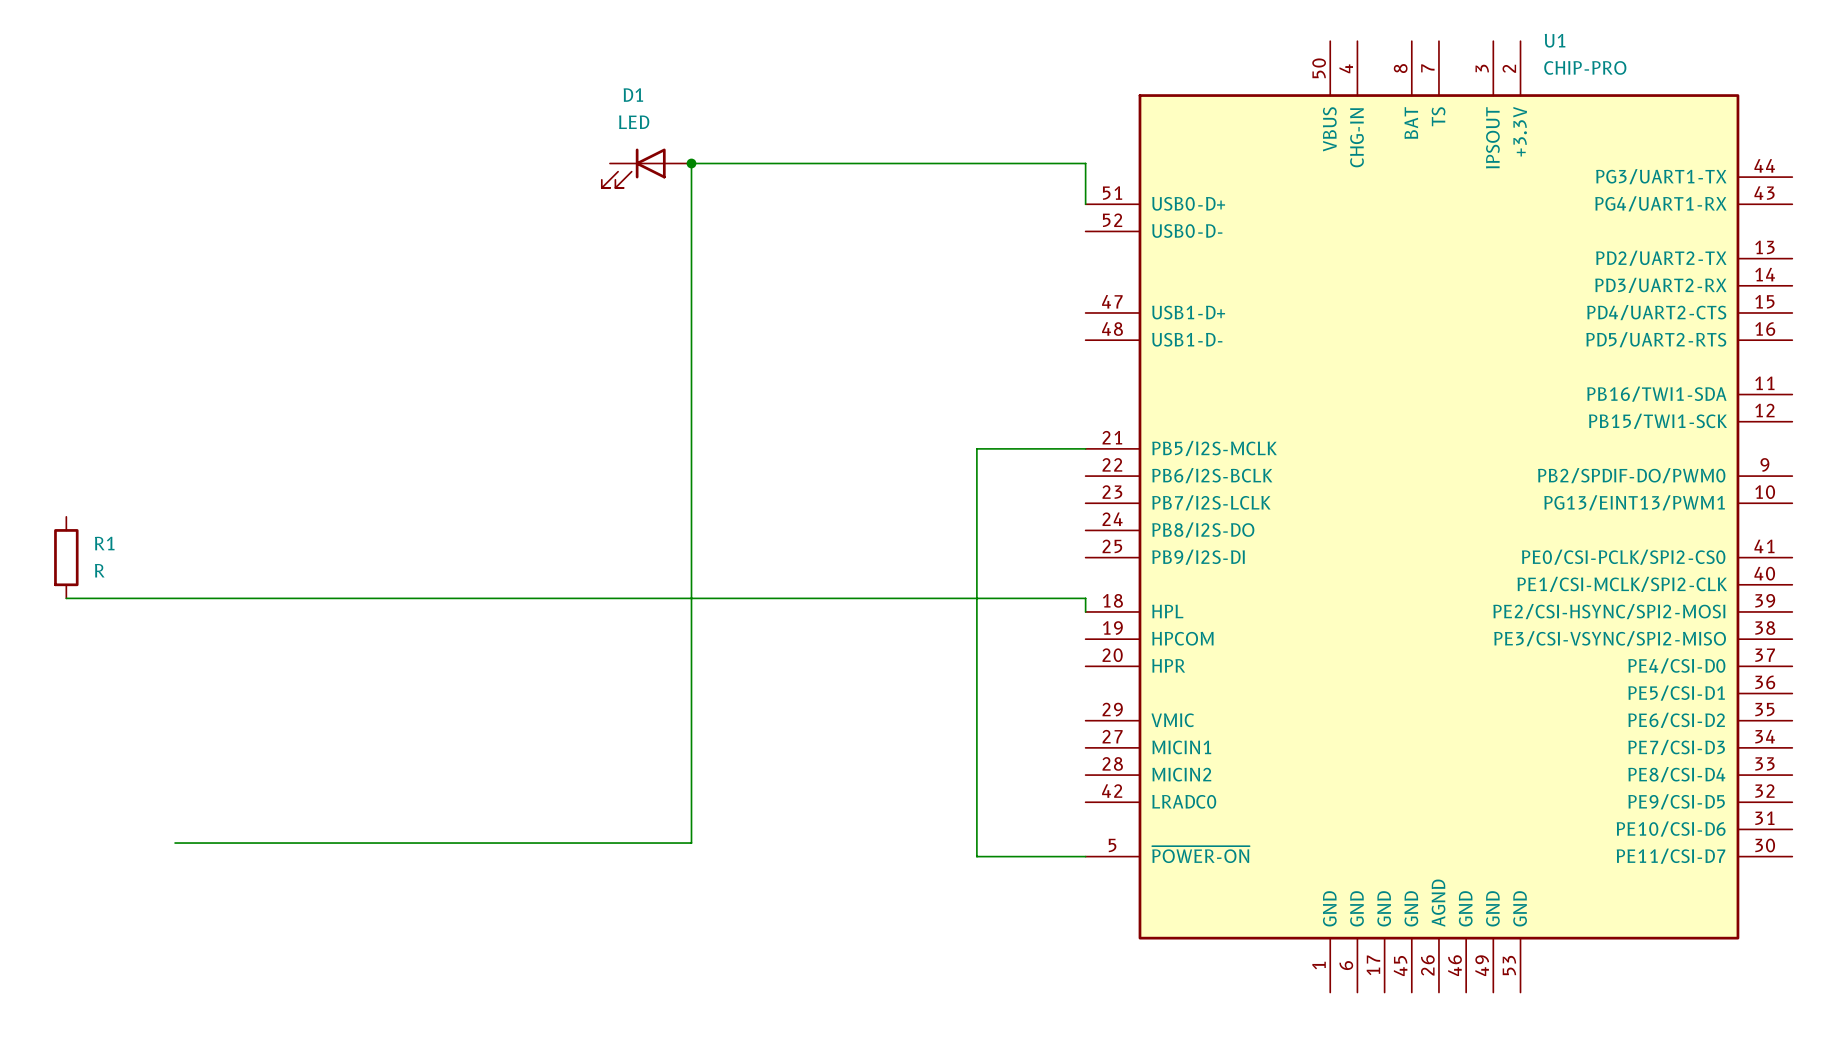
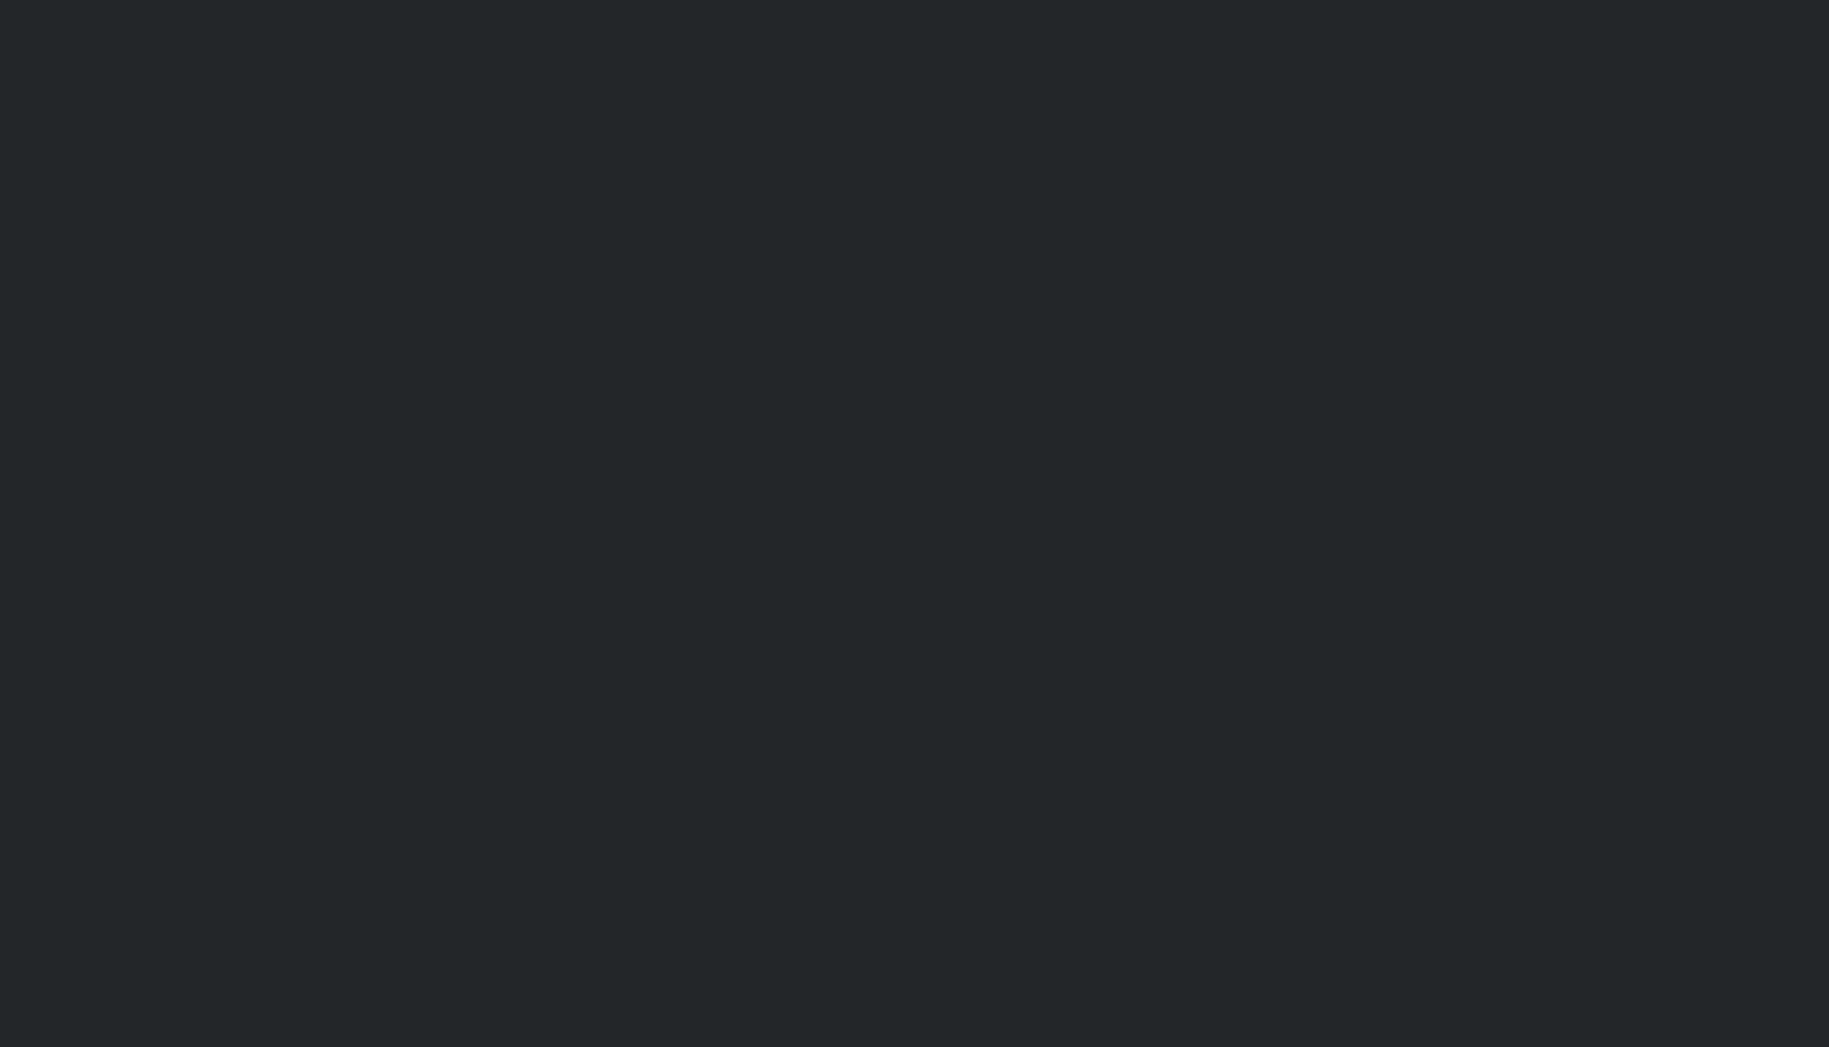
junction: (691, 163) -> none
D1: LED (646, 168) -> none
wire: (1085, 204) (1085, 163) (691, 163) (691, 843) (175, 843) -> none
wire: (1085, 448) (976, 448) (976, 856) (1085, 856) -> none
U1: CHIP-PRO (1438, 516) -> none
R1: R (66, 557) -> none
wire: (66, 598) (1085, 598) (1085, 611) -> none

